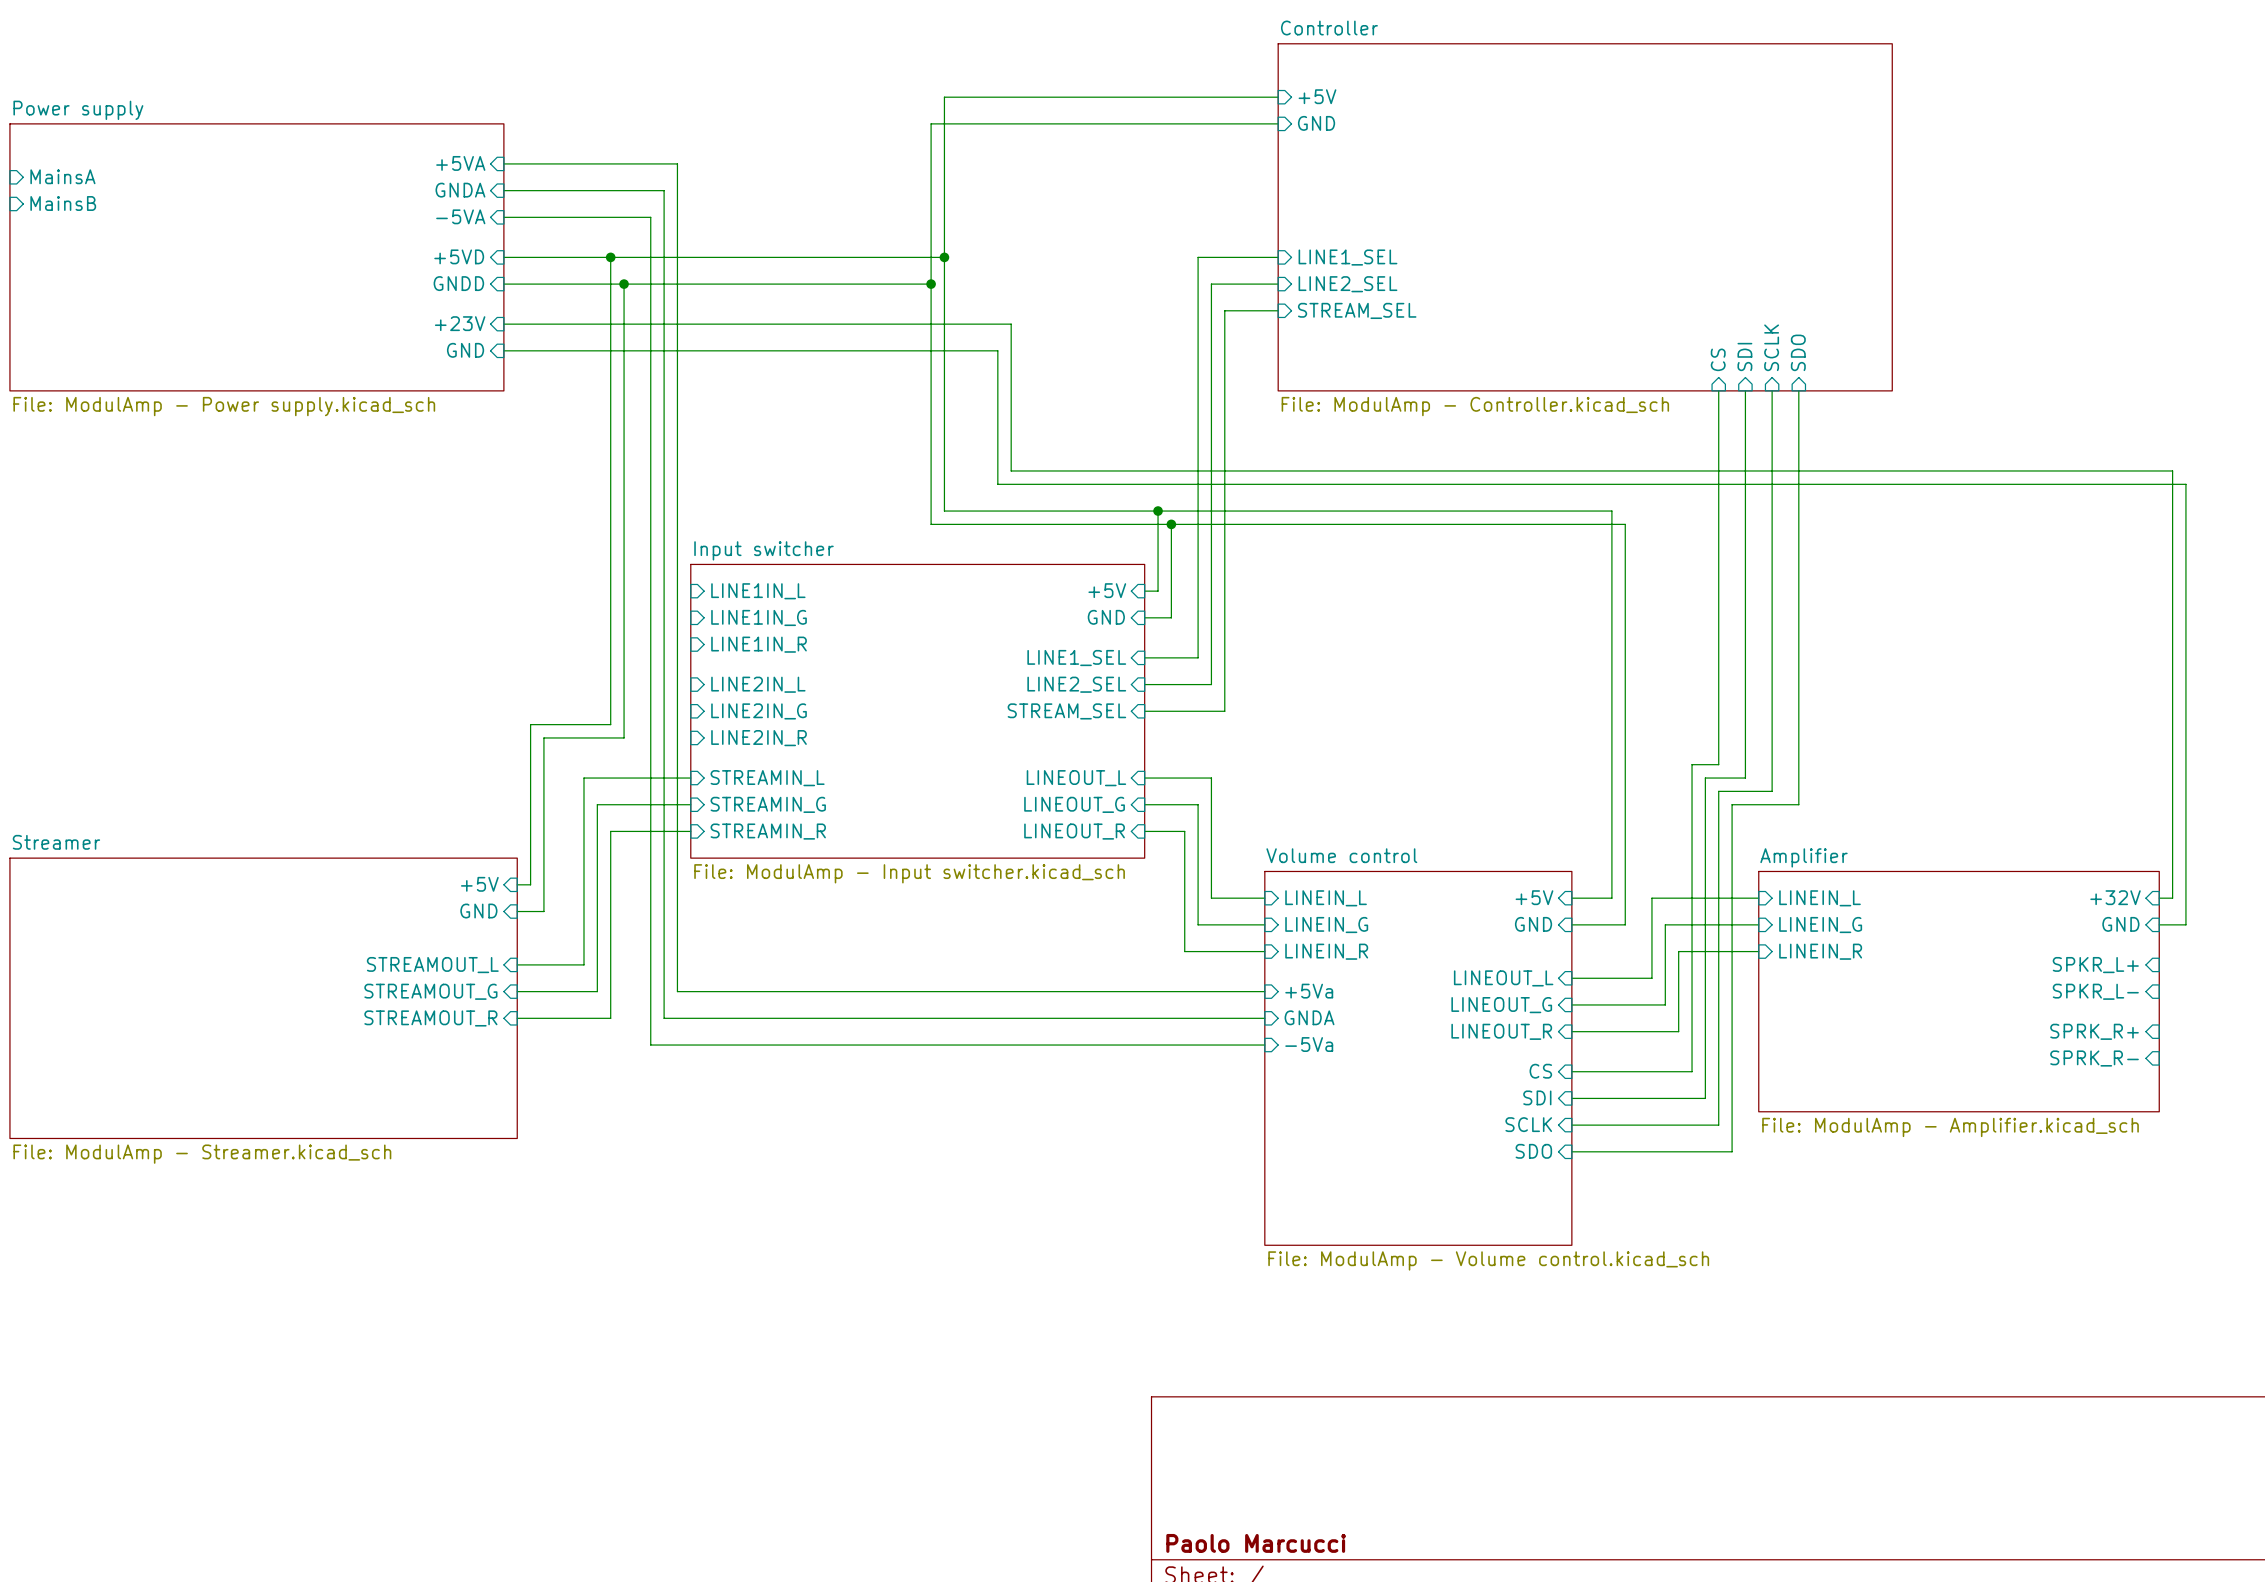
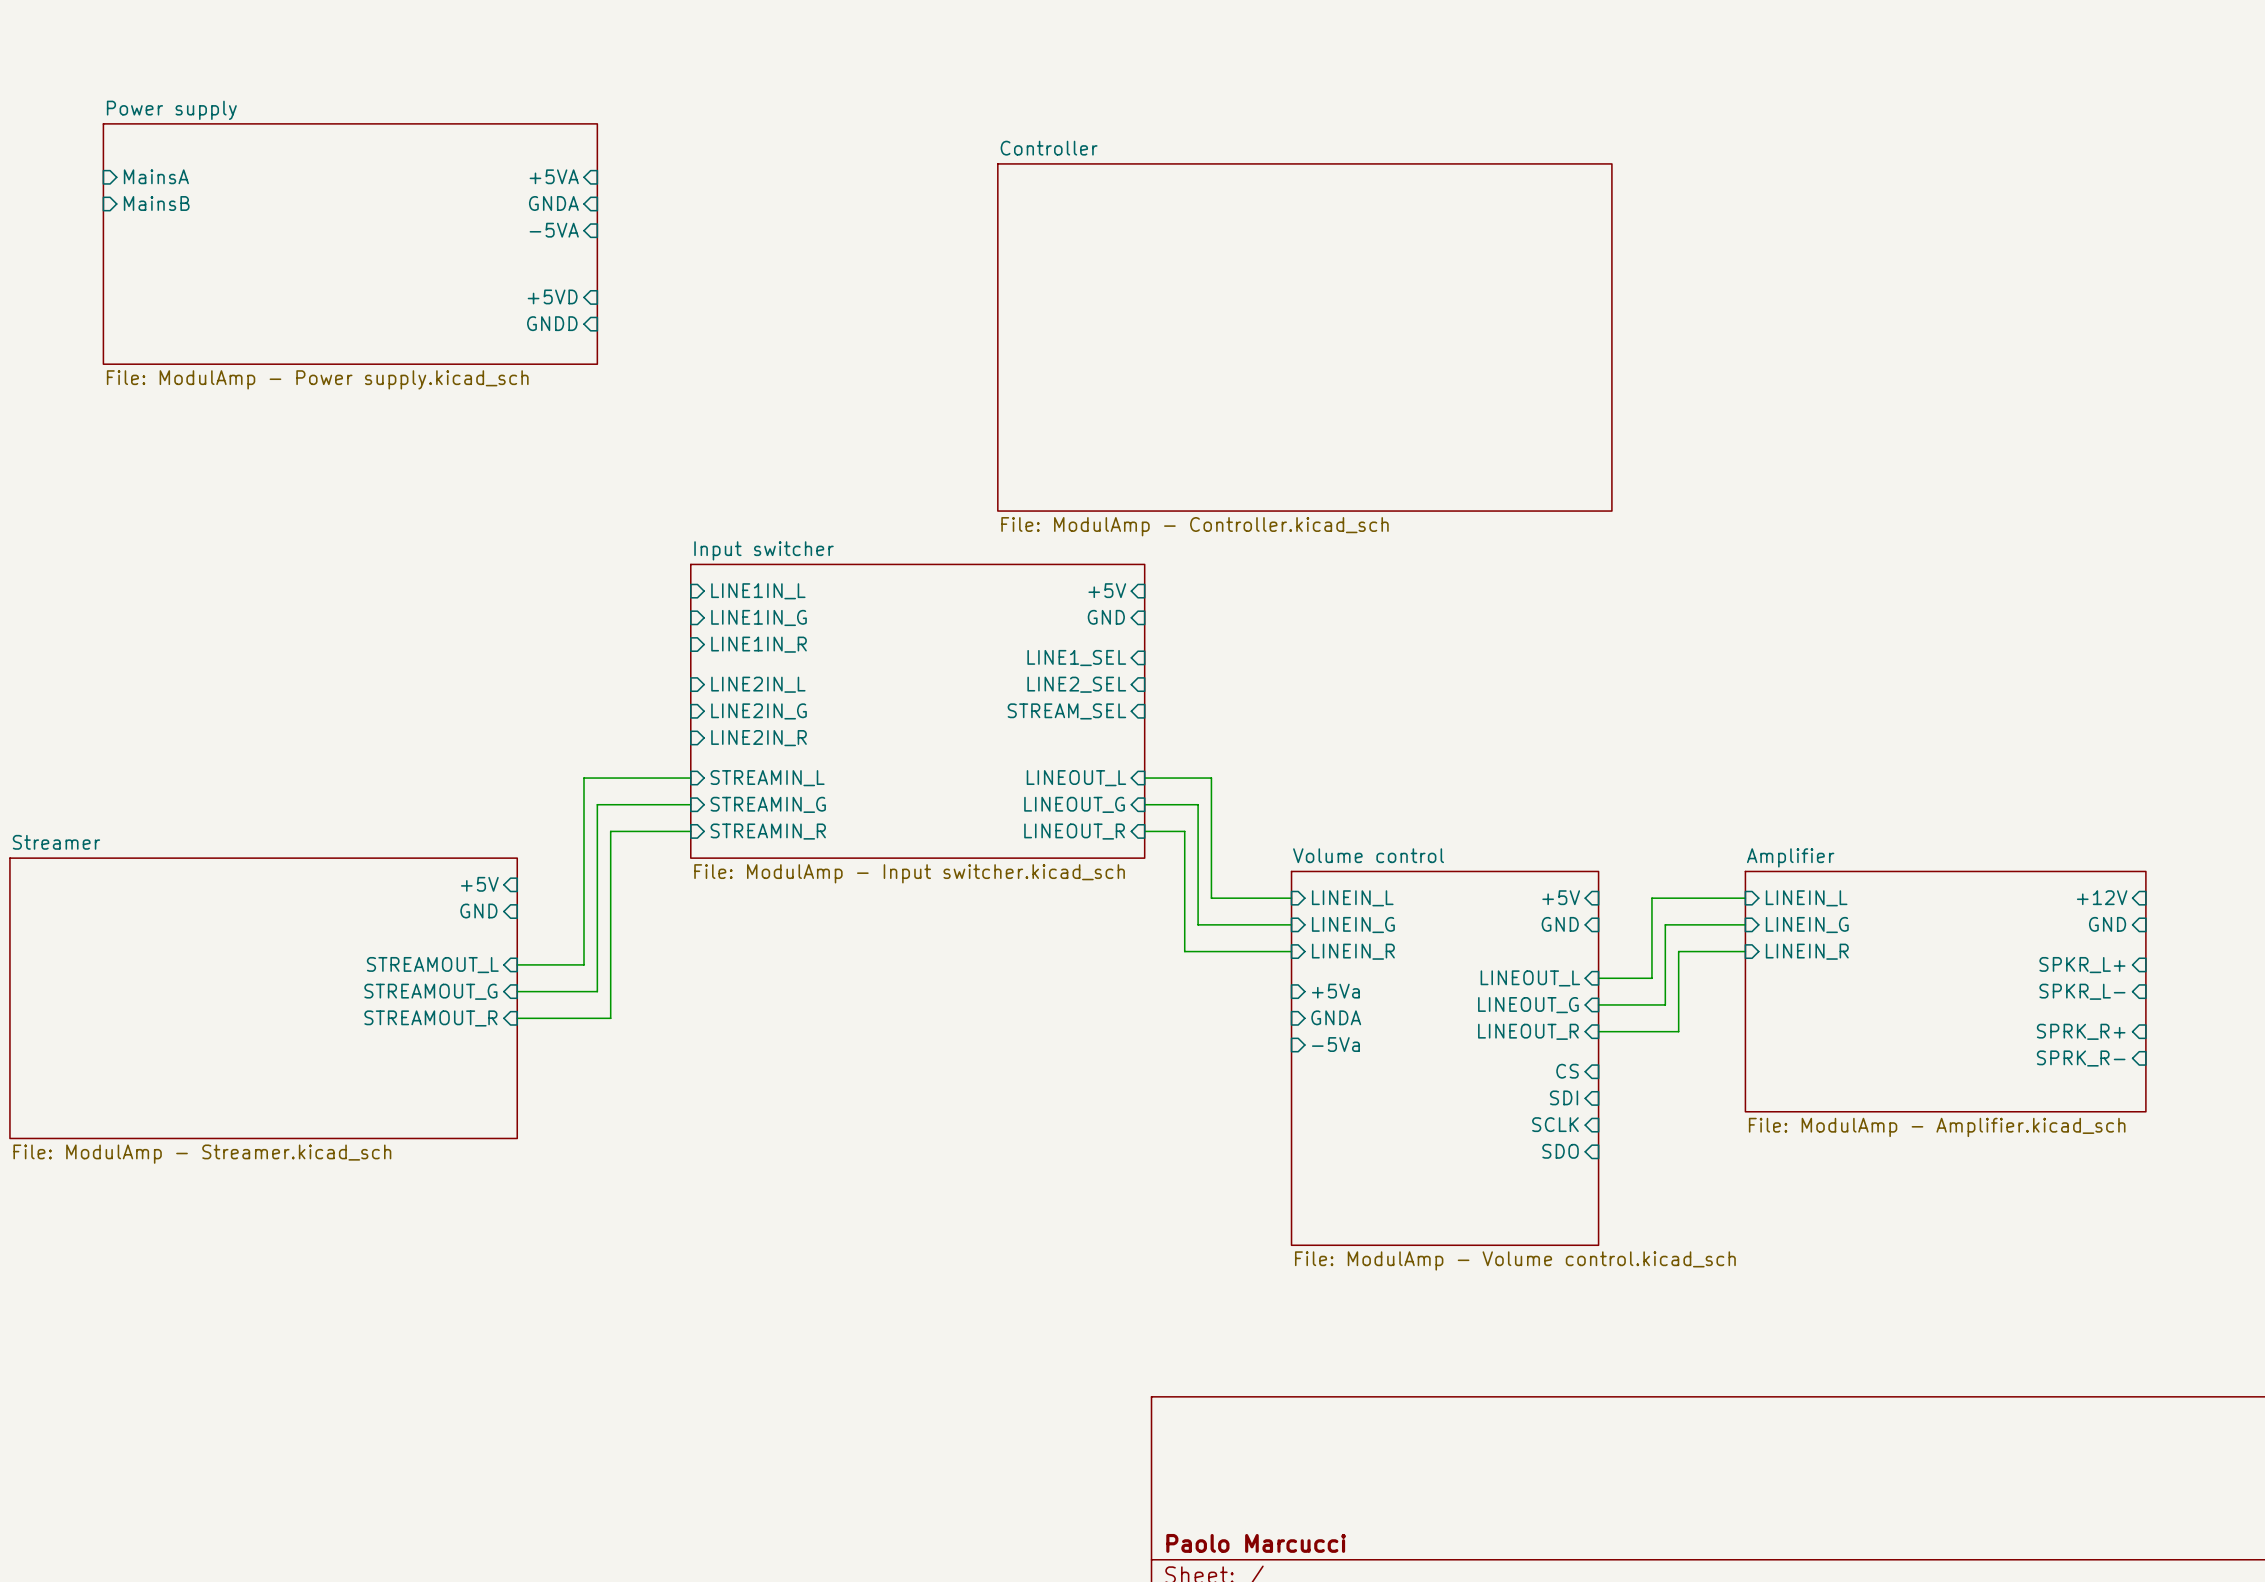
sheet pin: +5V (1317, 96) -> none
wire: (1278, 97) (944, 97) (944, 511) (1611, 511) (1611, 898) (1571, 898) -> none
wire: (1278, 123) (931, 123) (931, 524) (1625, 524) (1625, 924) (1571, 924) -> none
sheet pin: GND (1316, 123) -> none
sheet pin position: +5VA (460, 163) -> +5VA (554, 176)
wire: (503, 163) (677, 163) (677, 991) (1264, 991) -> none
sheet pin position: MainsA (62, 176) -> MainsA (156, 176)
sheet pin position: GNDA (460, 190) -> GNDA (553, 203)
wire: (503, 190) (664, 190) (664, 1018) (1264, 1018) -> none
sheet pin position: MainsB (63, 203) -> MainsB (156, 203)
sheet pin position: -5VA (460, 216) -> -5VA (554, 230)
wire: (503, 217) (650, 217) (650, 1045) (1264, 1045) -> none
sheet Controller: File: ModulAmp - Controller.kicad_sch (1585, 217) -> none
sheet Power supply: none -> File: ModulAmp - Power supply.kicad_sch (350, 244)
sheet pin position: +5VD (459, 256) -> +5VD (552, 296)
sheet Power supply: File: ModulAmp - Power supply.kicad_sch (256, 257) -> none
wire: (503, 257) (944, 257) -> none
wire: (610, 257) (610, 724) (530, 724) (530, 884) (517, 884) -> none
junction: (610, 257) -> none
junction: (944, 257) -> none
wire: (1278, 257) (1198, 257) (1198, 657) (1144, 657) -> none
sheet pin: LINE1_SEL (1347, 257) -> none
sheet pin position: GNDD (458, 283) -> GNDD (552, 323)
wire: (503, 284) (931, 284) -> none
wire: (624, 284) (624, 737) (543, 737) (543, 911) (517, 911) -> none
junction: (624, 284) -> none
junction: (931, 284) -> none
wire: (1278, 284) (1211, 284) (1211, 684) (1144, 684) -> none
sheet pin: LINE2_SEL (1347, 284) -> none
wire: (1278, 310) (1224, 310) (1224, 711) (1144, 711) -> none
sheet pin: STREAM_SEL (1357, 310) -> none
sheet pin: +23V (460, 323) -> none
wire: (503, 324) (1011, 324) (1011, 470) (2172, 470) (2172, 898) (2159, 898) -> none
sheet Controller: none -> File: ModulAmp - Controller.kicad_sch (1304, 337)
sheet pin: SCLK (1771, 347) -> none
sheet pin: GND (465, 350) -> none
wire: (503, 350) (997, 350) (997, 484) (2185, 484) (2185, 924) (2159, 924) -> none
sheet pin: SDO (1798, 352) -> none
sheet pin: SDI (1744, 356) -> none
sheet pin: CS (1718, 359) -> none
wire: (1718, 390) (1718, 764) (1692, 764) (1692, 1071) (1571, 1071) -> none
wire: (1745, 390) (1745, 778) (1705, 778) (1705, 1098) (1571, 1098) -> none
wire: (1772, 390) (1772, 791) (1718, 791) (1718, 1125) (1571, 1125) -> none
wire: (1798, 390) (1798, 804) (1732, 804) (1732, 1151) (1571, 1151) -> none
wire: (1158, 511) (1158, 591) (1144, 591) -> none
junction: (1158, 511) -> none
wire: (1171, 524) (1171, 617) (1144, 617) -> none
junction: (1171, 524) -> none
sheet pin position: +5V (1534, 897) -> +5V (1561, 897)
sheet pin: +32V (2115, 897) -> +12V (2102, 897)
wire: none -> (1264, 898) (1291, 898)
sheet pin position: LINEIN_L (1326, 898) -> LINEIN_L (1352, 898)
wire: (1745, 898) (1758, 898) -> none
sheet pin position: LINEIN_L (1820, 898) -> LINEIN_L (1806, 898)
wire: none -> (1264, 924) (1291, 924)
sheet pin position: GND (1533, 924) -> GND (1560, 924)
wire: (1745, 924) (1758, 924) -> none
sheet pin position: GND (2120, 924) -> GND (2107, 924)
sheet pin position: LINEIN_G (1326, 925) -> LINEIN_G (1353, 925)
sheet pin position: LINEIN_G (1820, 925) -> LINEIN_G (1807, 925)
wire: none -> (1264, 951) (1291, 951)
sheet pin position: LINEIN_R (1326, 951) -> LINEIN_R (1353, 951)
wire: (1745, 951) (1758, 951) -> none
sheet pin position: LINEIN_R (1820, 951) -> LINEIN_R (1807, 951)
sheet pin position: SPKR_L+ (2095, 965) -> SPKR_L+ (2082, 965)
sheet pin position: LINEOUT_L (1503, 978) -> LINEOUT_L (1530, 978)
wire: (1571, 978) (1598, 978) -> none
sheet pin position: +5Va (1309, 991) -> +5Va (1335, 991)
sheet Amplifier position: (1959, 991) -> (1945, 991)
sheet pin position: SPKR_L- (2095, 991) -> SPKR_L- (2082, 991)
wire: (1571, 1004) (1598, 1004) -> none
sheet pin position: LINEOUT_G (1501, 1005) -> LINEOUT_G (1528, 1005)
sheet pin position: GNDA (1309, 1017) -> GNDA (1336, 1017)
sheet pin position: LINEOUT_R (1501, 1031) -> LINEOUT_R (1528, 1031)
wire: (1571, 1031) (1598, 1031) -> none
sheet pin position: SPRK_R+ (2094, 1031) -> SPRK_R+ (2081, 1031)
sheet pin position: -5Va (1309, 1044) -> -5Va (1335, 1044)
sheet Volume control position: (1418, 1058) -> (1445, 1058)
sheet pin position: SPRK_R- (2094, 1058) -> SPRK_R- (2081, 1058)
sheet pin position: CS (1540, 1071) -> CS (1567, 1071)
sheet pin position: SDI (1537, 1097) -> SDI (1564, 1097)
sheet pin position: SCLK (1528, 1124) -> SCLK (1555, 1124)
sheet pin position: SDO (1533, 1151) -> SDO (1560, 1151)

